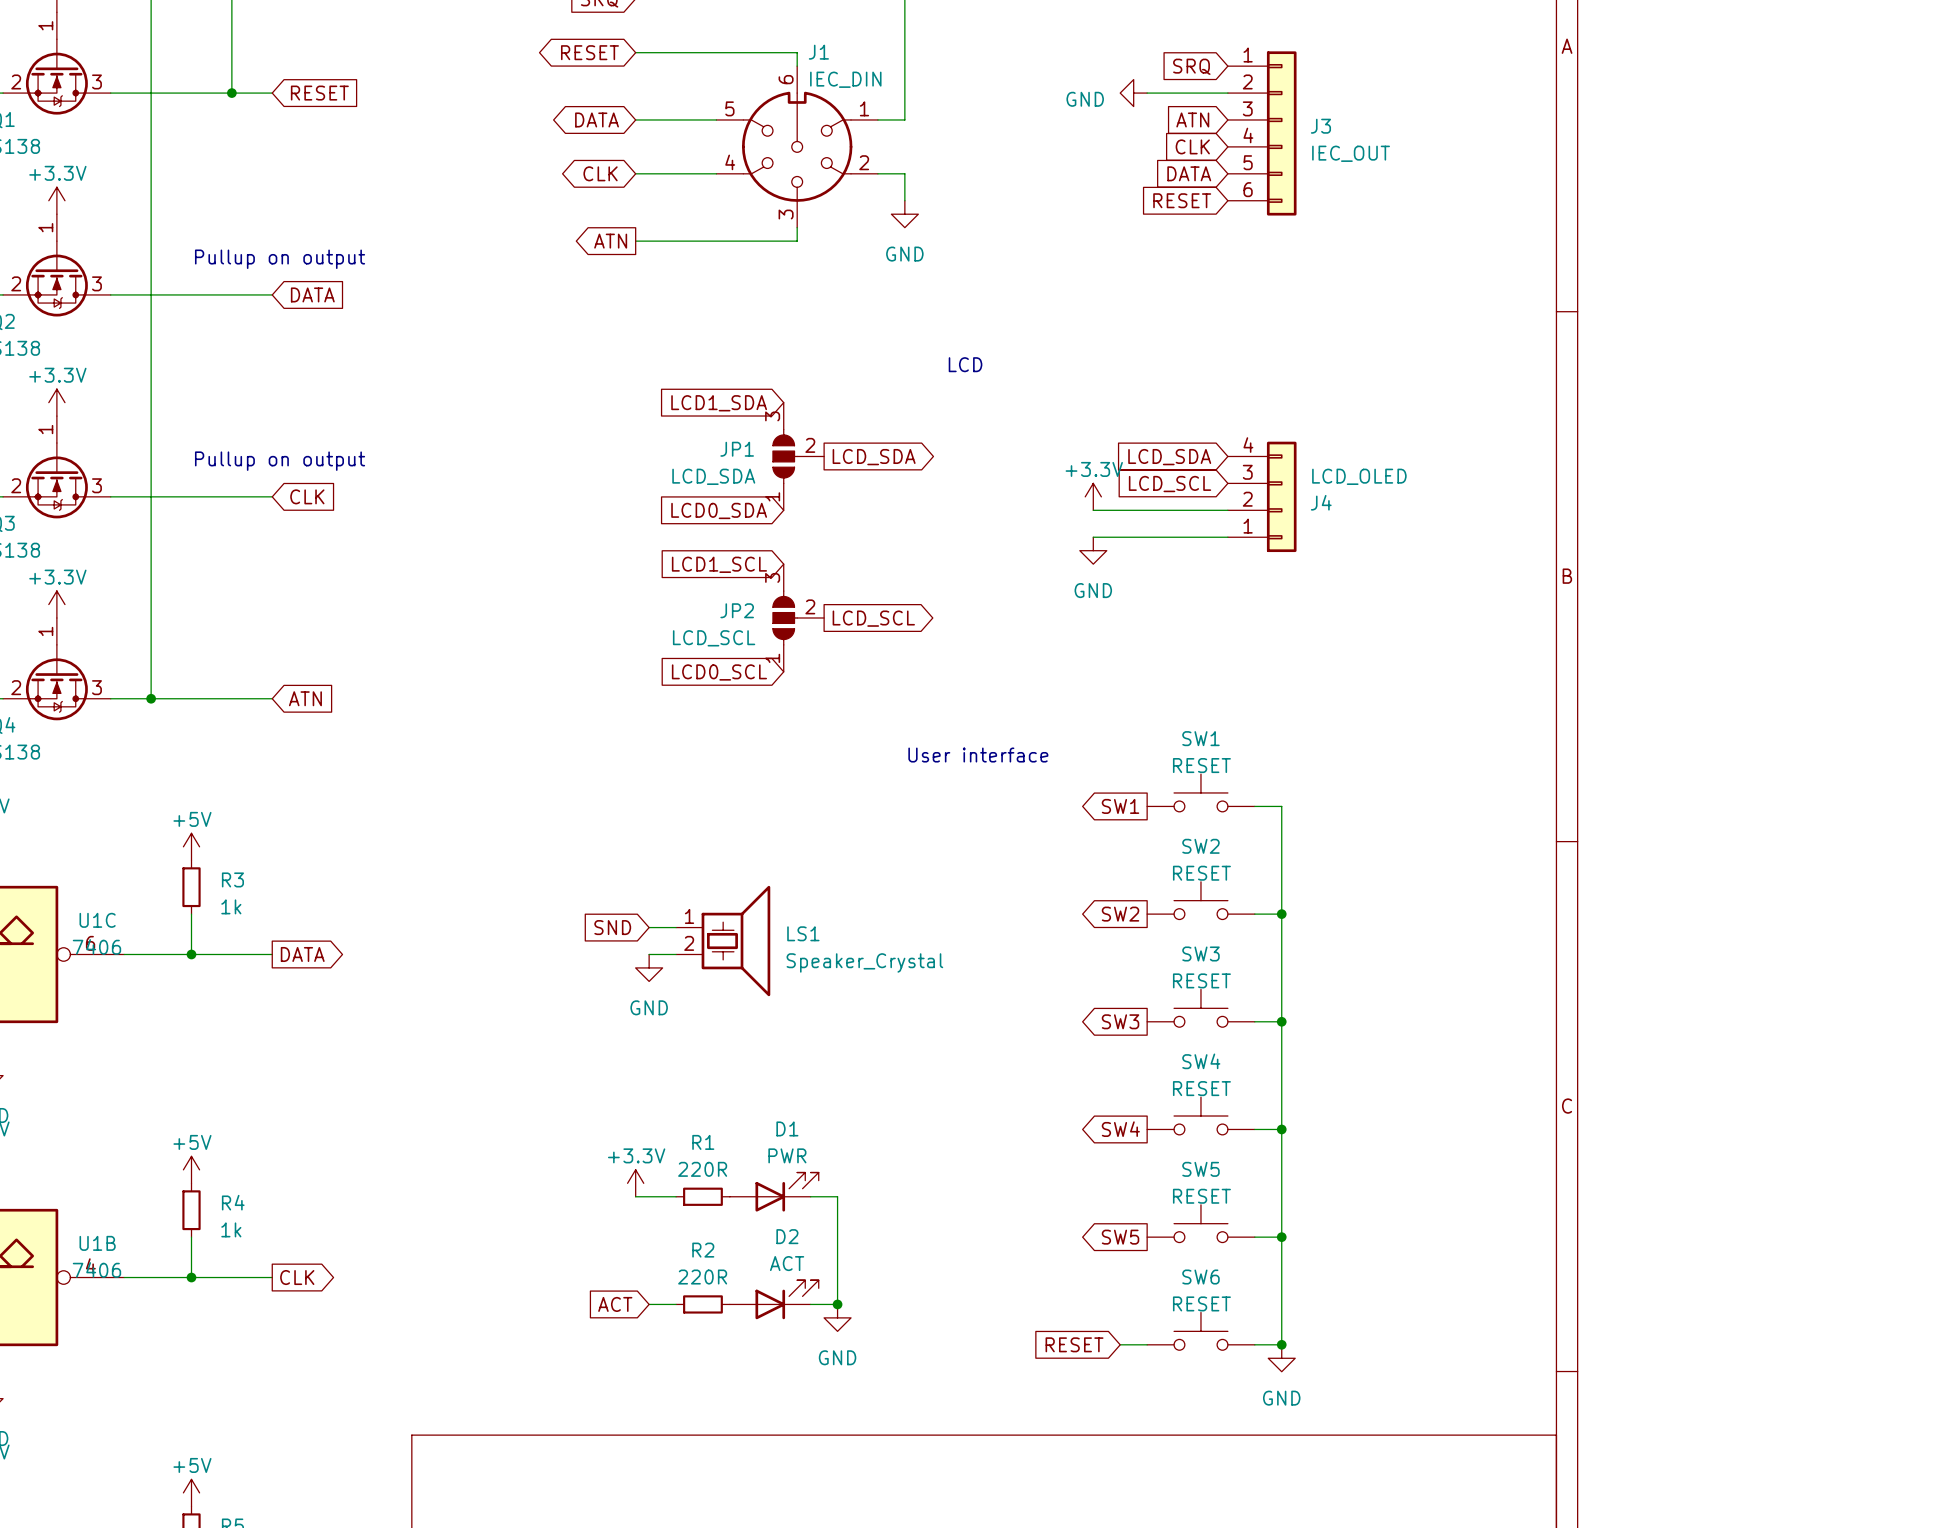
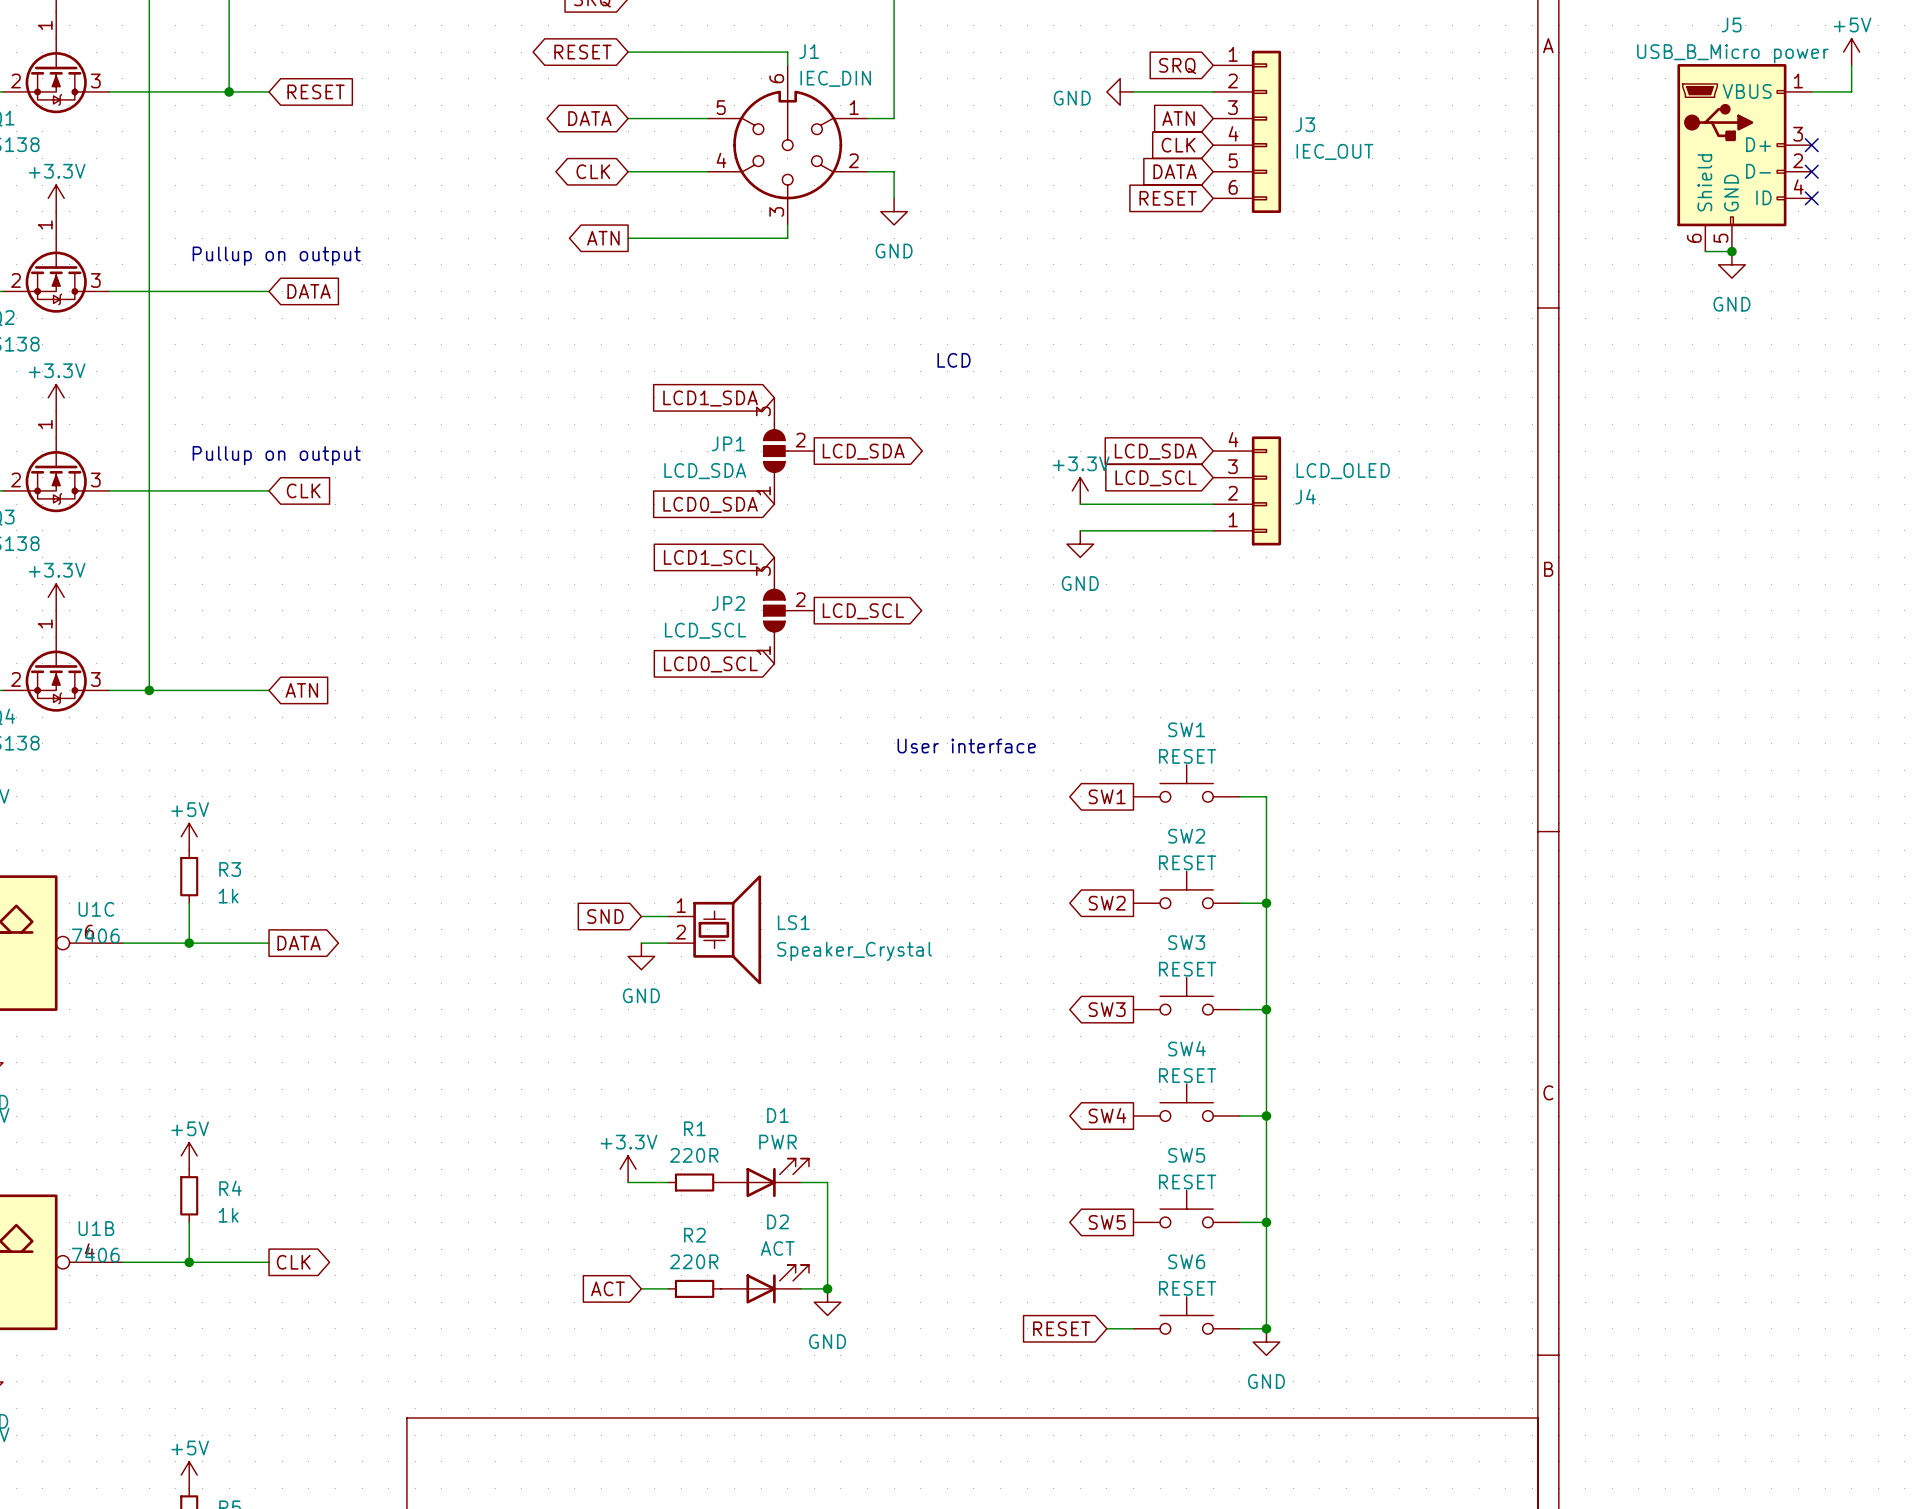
power symbol: none -> +5V (1851, 52)
wire: none -> (1851, 65) (1851, 91) (1811, 91)
no-connect mark: none -> (1811, 145)
J5: none -> USB_B_Micro power (1744, 157)
no-connect mark: none -> (1811, 171)
no-connect mark: none -> (1811, 198)
wire: none -> (1705, 251) (1731, 251)
junction: none -> (1731, 251)
power symbol: none -> GND (1731, 264)

